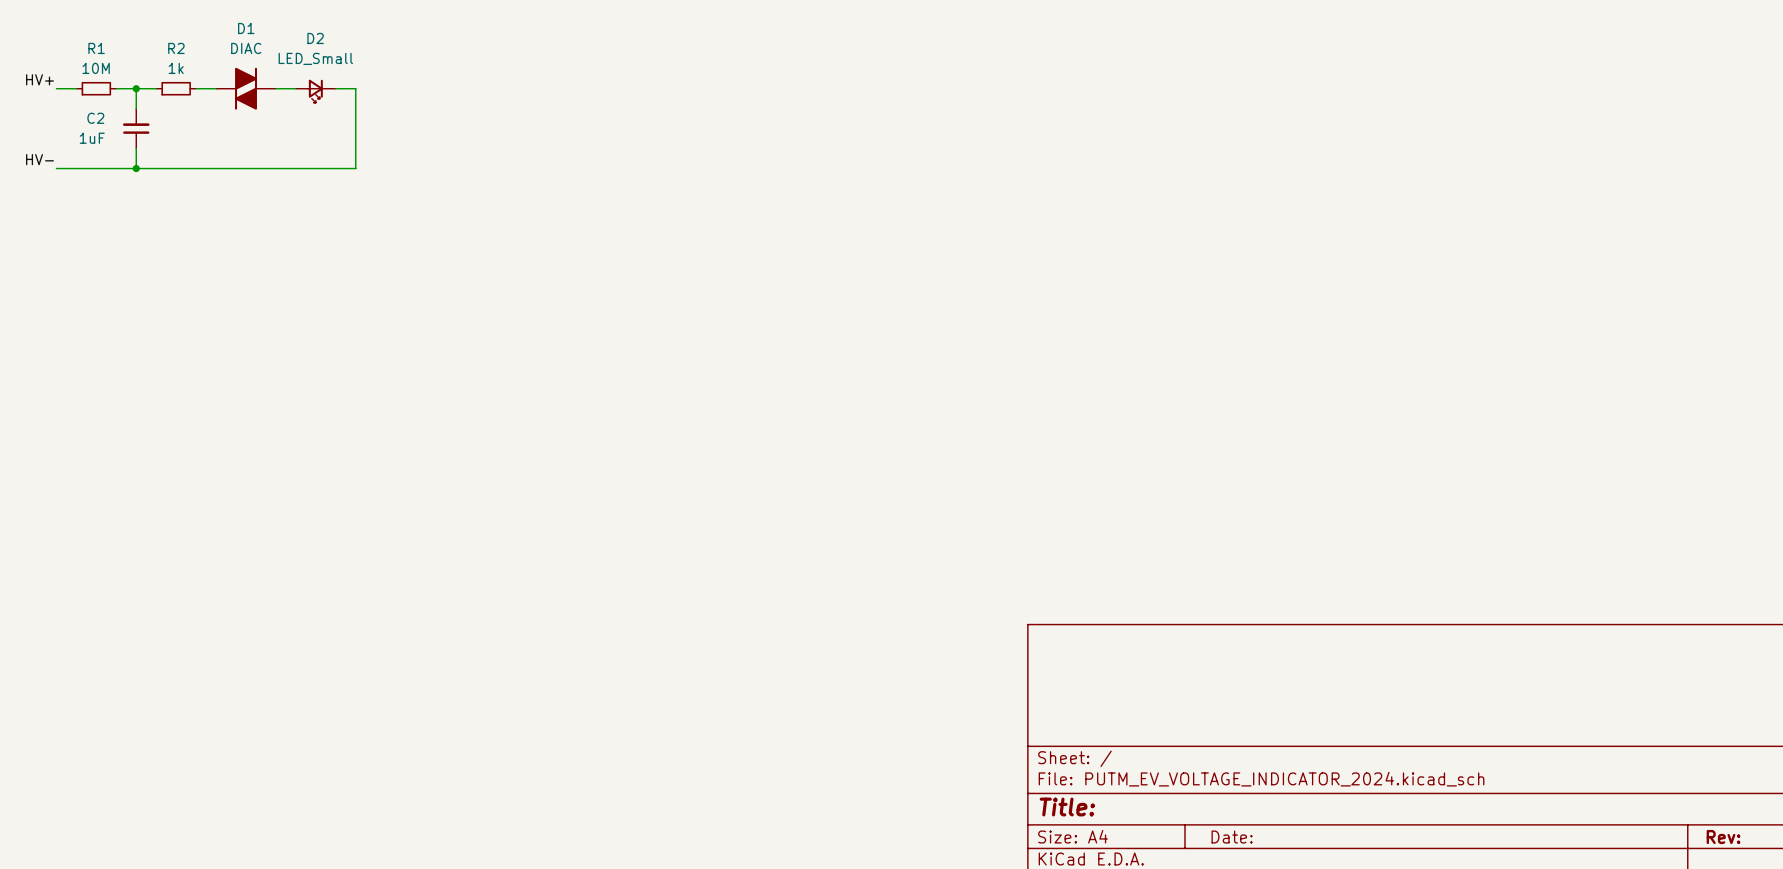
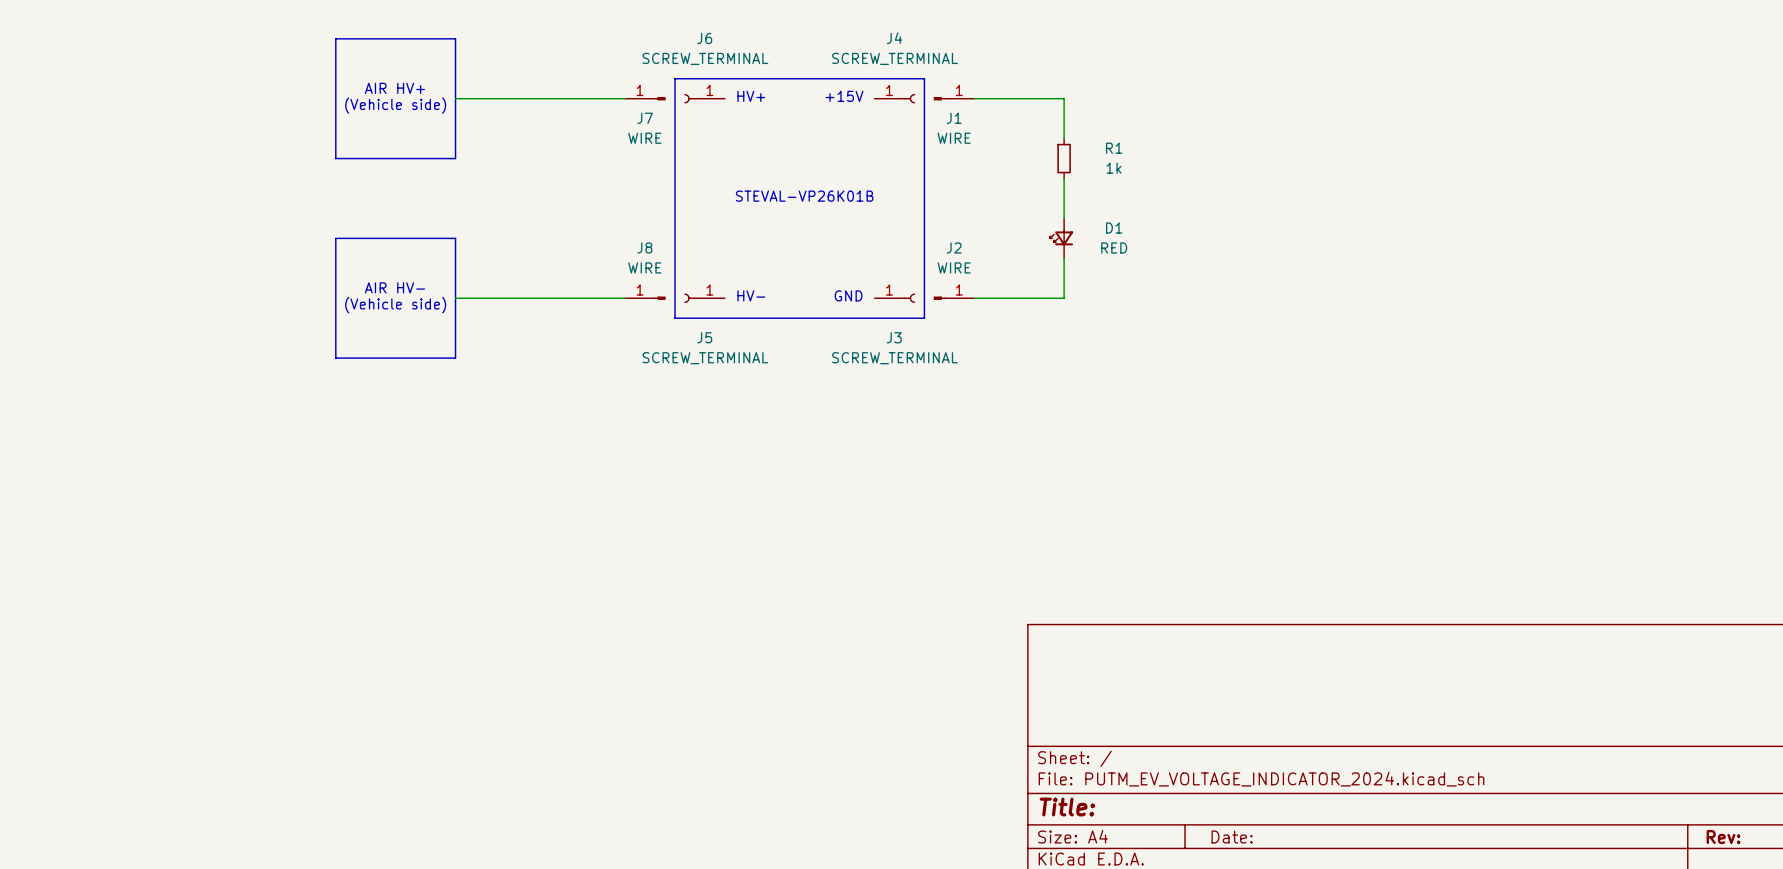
D1 name position: D1 (246, 28) -> D1 (1114, 228)
line: none -> (335, 38) (335, 158) (455, 158) (455, 38) (335, 38)
D1 value: DIAC (246, 48) -> RED (1114, 247)
D1 symbol: [216, 67, 276, 110] -> [1050, 218, 1074, 259]
R1 value: 10M (96, 68) -> 1k (1113, 168)
line: none -> (675, 78) (924, 78) (924, 318) (675, 318) (675, 78)
label: HV+ (39, 79) -> none
wire: (56, 88) (76, 88) -> none
R1 rotation: 0° (96, 88) -> 90° clockwise (1064, 158)
R1 position: (96, 88) -> (1064, 158)
wire: (116, 88) (156, 88) -> none
wire: (136, 88) (136, 108) -> none
junction: (136, 88) -> none
R2: 1k (176, 88) -> none
wire: (196, 88) (216, 88) -> none
wire: (275, 88) (295, 88) -> none
wire: (335, 88) (355, 88) (355, 168) (56, 168) -> none
text: none -> AIR HV+ (394, 88)
D2: LED_Small (315, 91) -> none
text: none -> HV+ (751, 96)
text: none -> +15V (844, 96)
wire: none -> (455, 98) (625, 98)
J7: none -> WIRE (645, 98)
J6: none -> SCREW_TERMINAL (704, 98)
J4: none -> SCREW_TERMINAL (894, 98)
J1: none -> WIRE (954, 98)
wire: none -> (974, 98) (1064, 98) (1064, 138)
text: none -> (Vehicle side) (395, 105)
C2: 1uF (136, 128) -> none
wire: (136, 148) (136, 168) -> none
label: HV- (39, 159) -> none
junction: (136, 168) -> none
wire: none -> (1064, 178) (1064, 218)
text: none -> STEVAL-VP26K01B (804, 196)
line: none -> (335, 238) (455, 238) (455, 358) (335, 358) (335, 238)
wire: none -> (1064, 258) (1064, 298) (974, 298)
text: none -> AIR HV- (394, 287)
text: none -> HV- (751, 295)
text: none -> GND (848, 295)
wire: none -> (455, 298) (625, 298)
J8: none -> WIRE (645, 298)
J5: none -> SCREW_TERMINAL (704, 298)
J3: none -> SCREW_TERMINAL (894, 298)
J2: none -> WIRE (954, 298)
text: none -> (Vehicle side) (395, 305)

